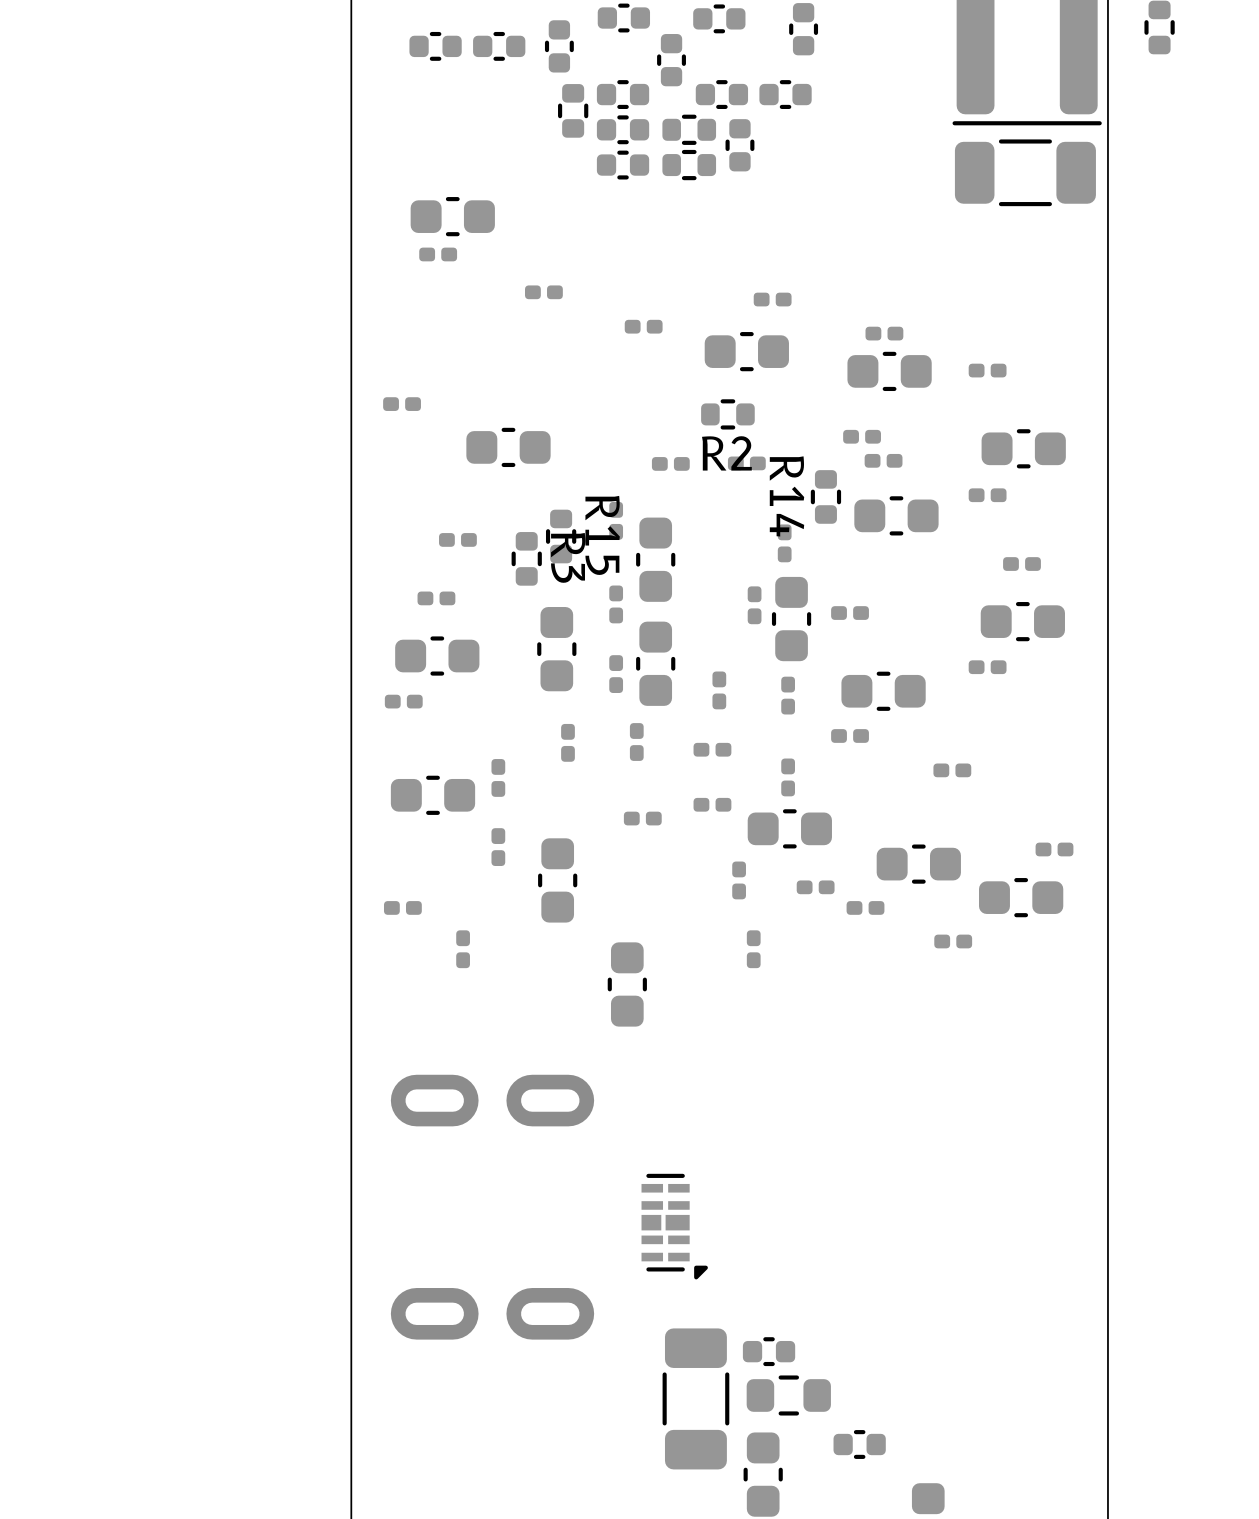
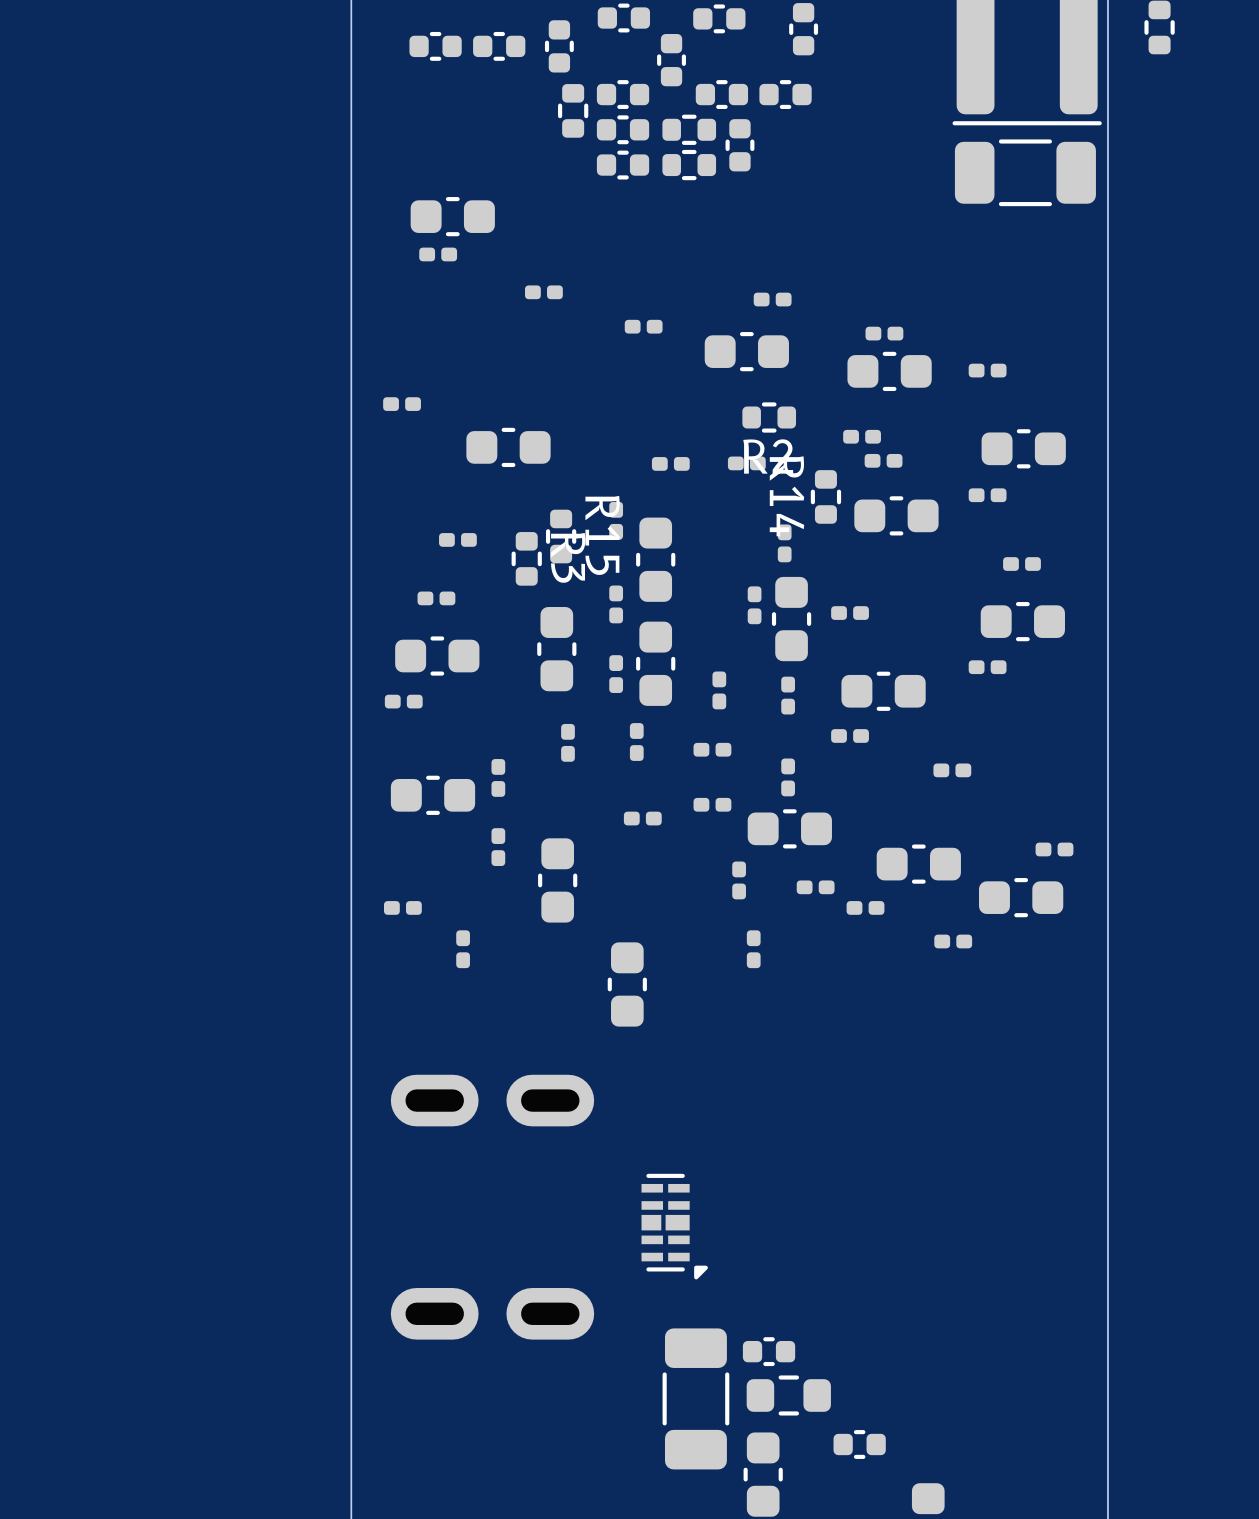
R2 position: (727, 414) -> (769, 417)

